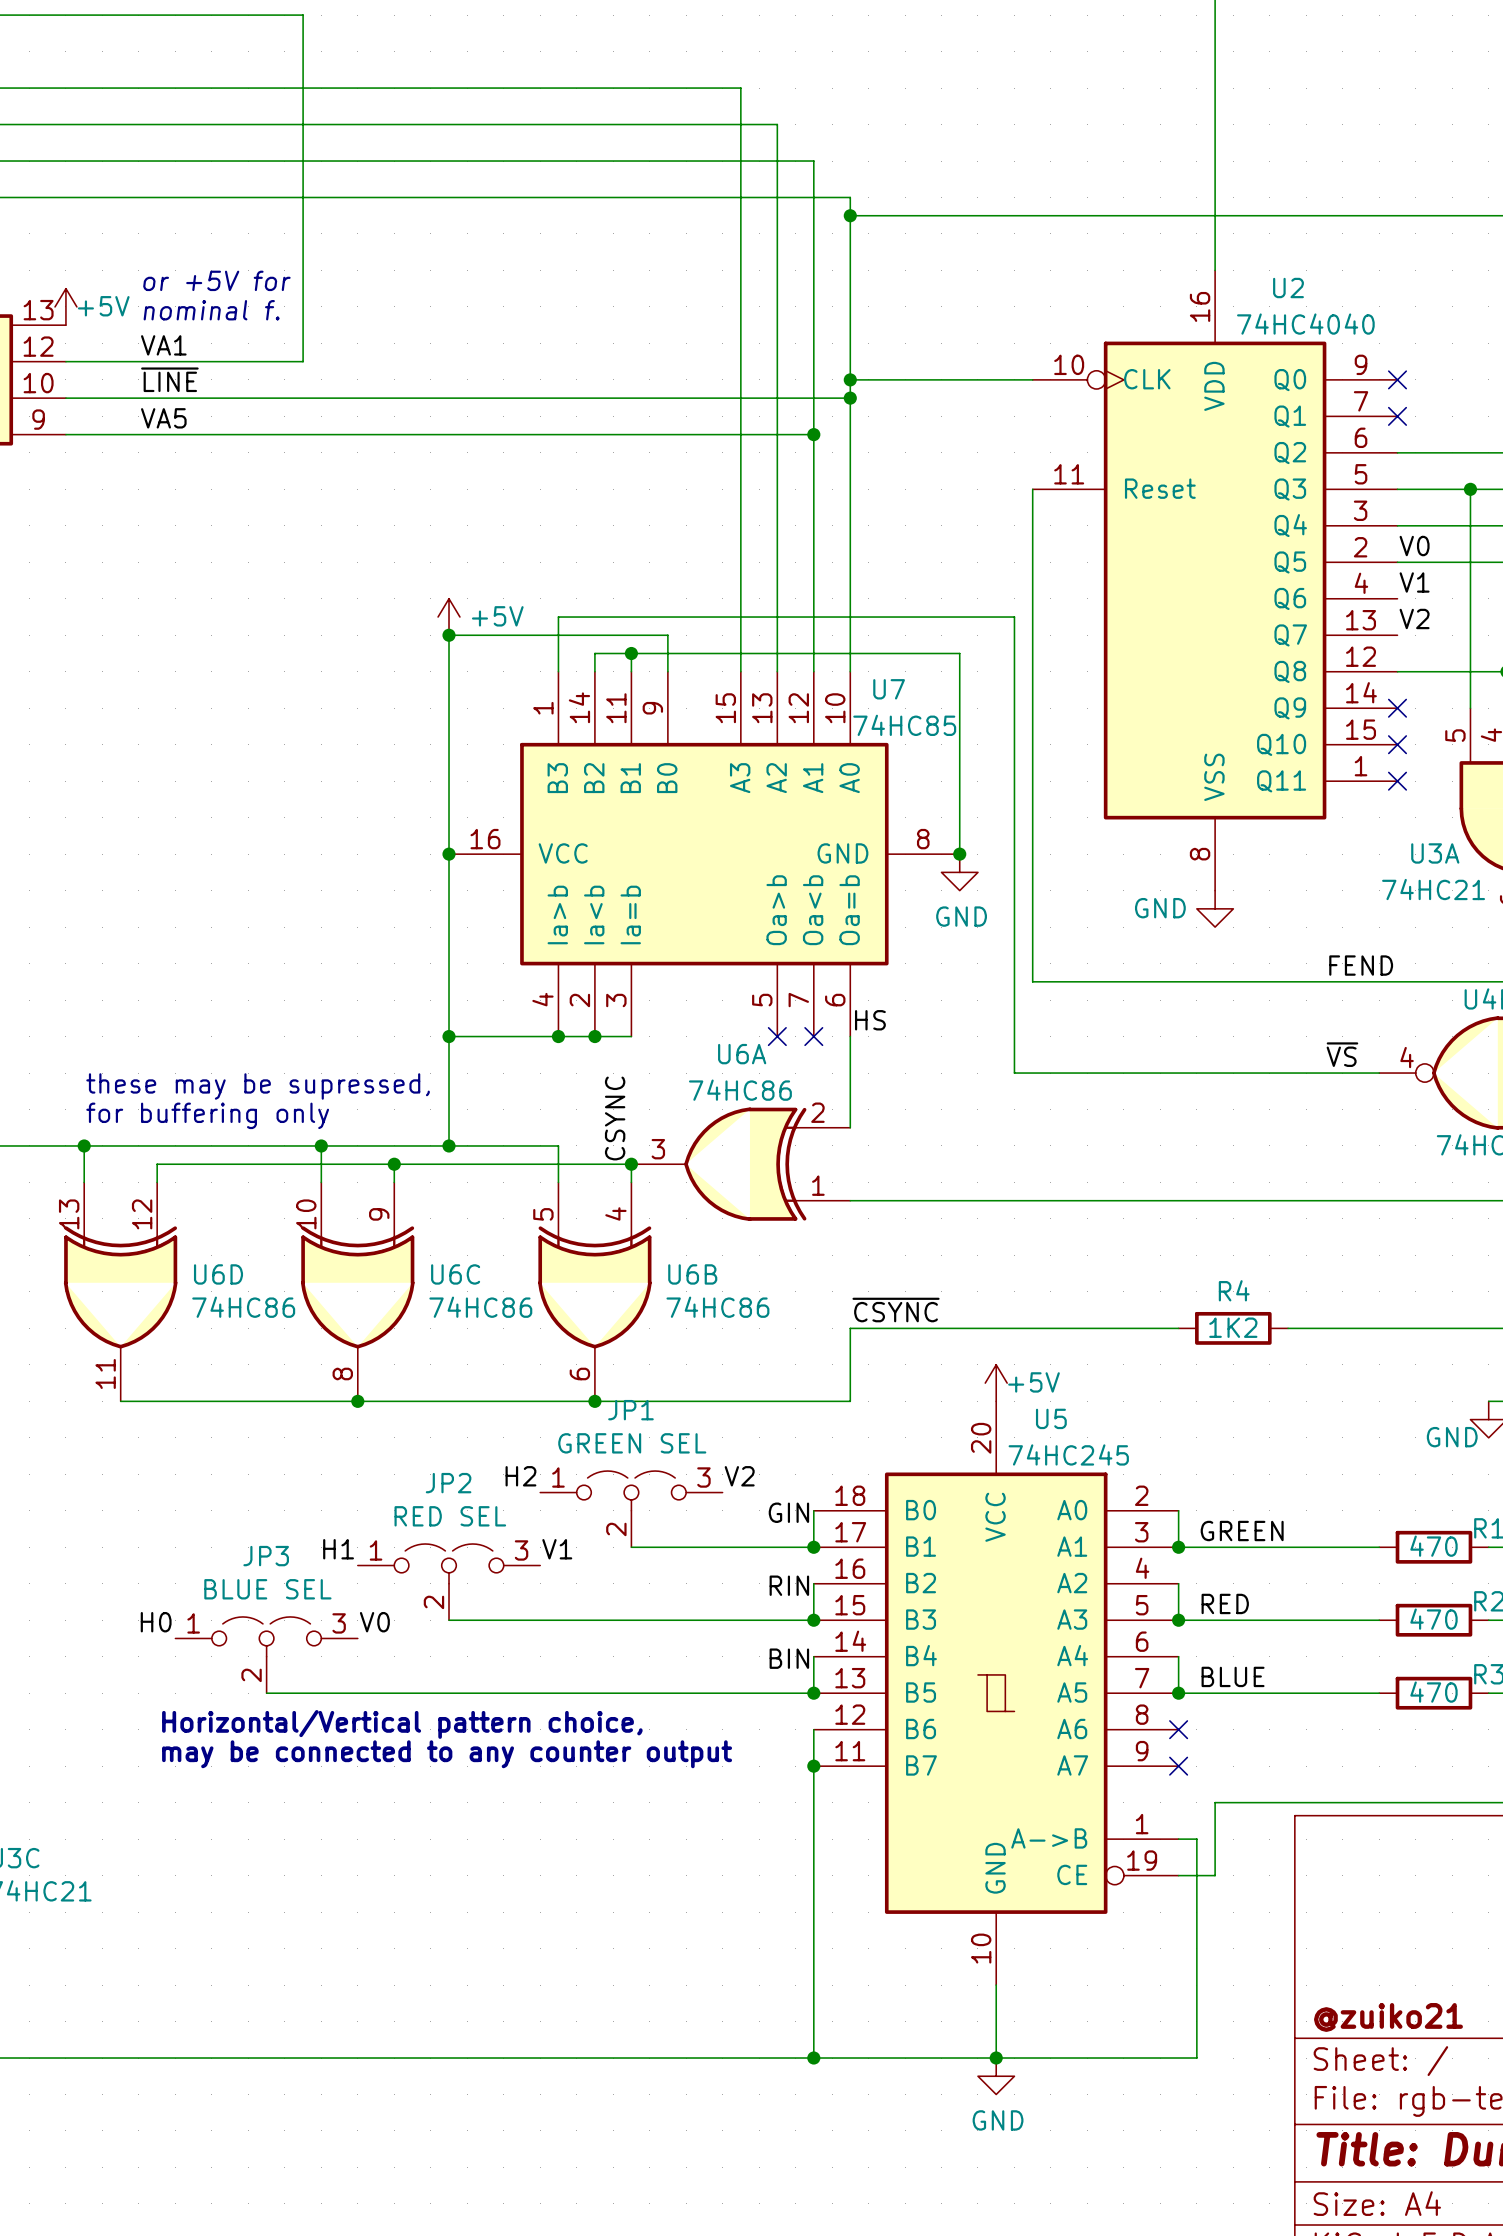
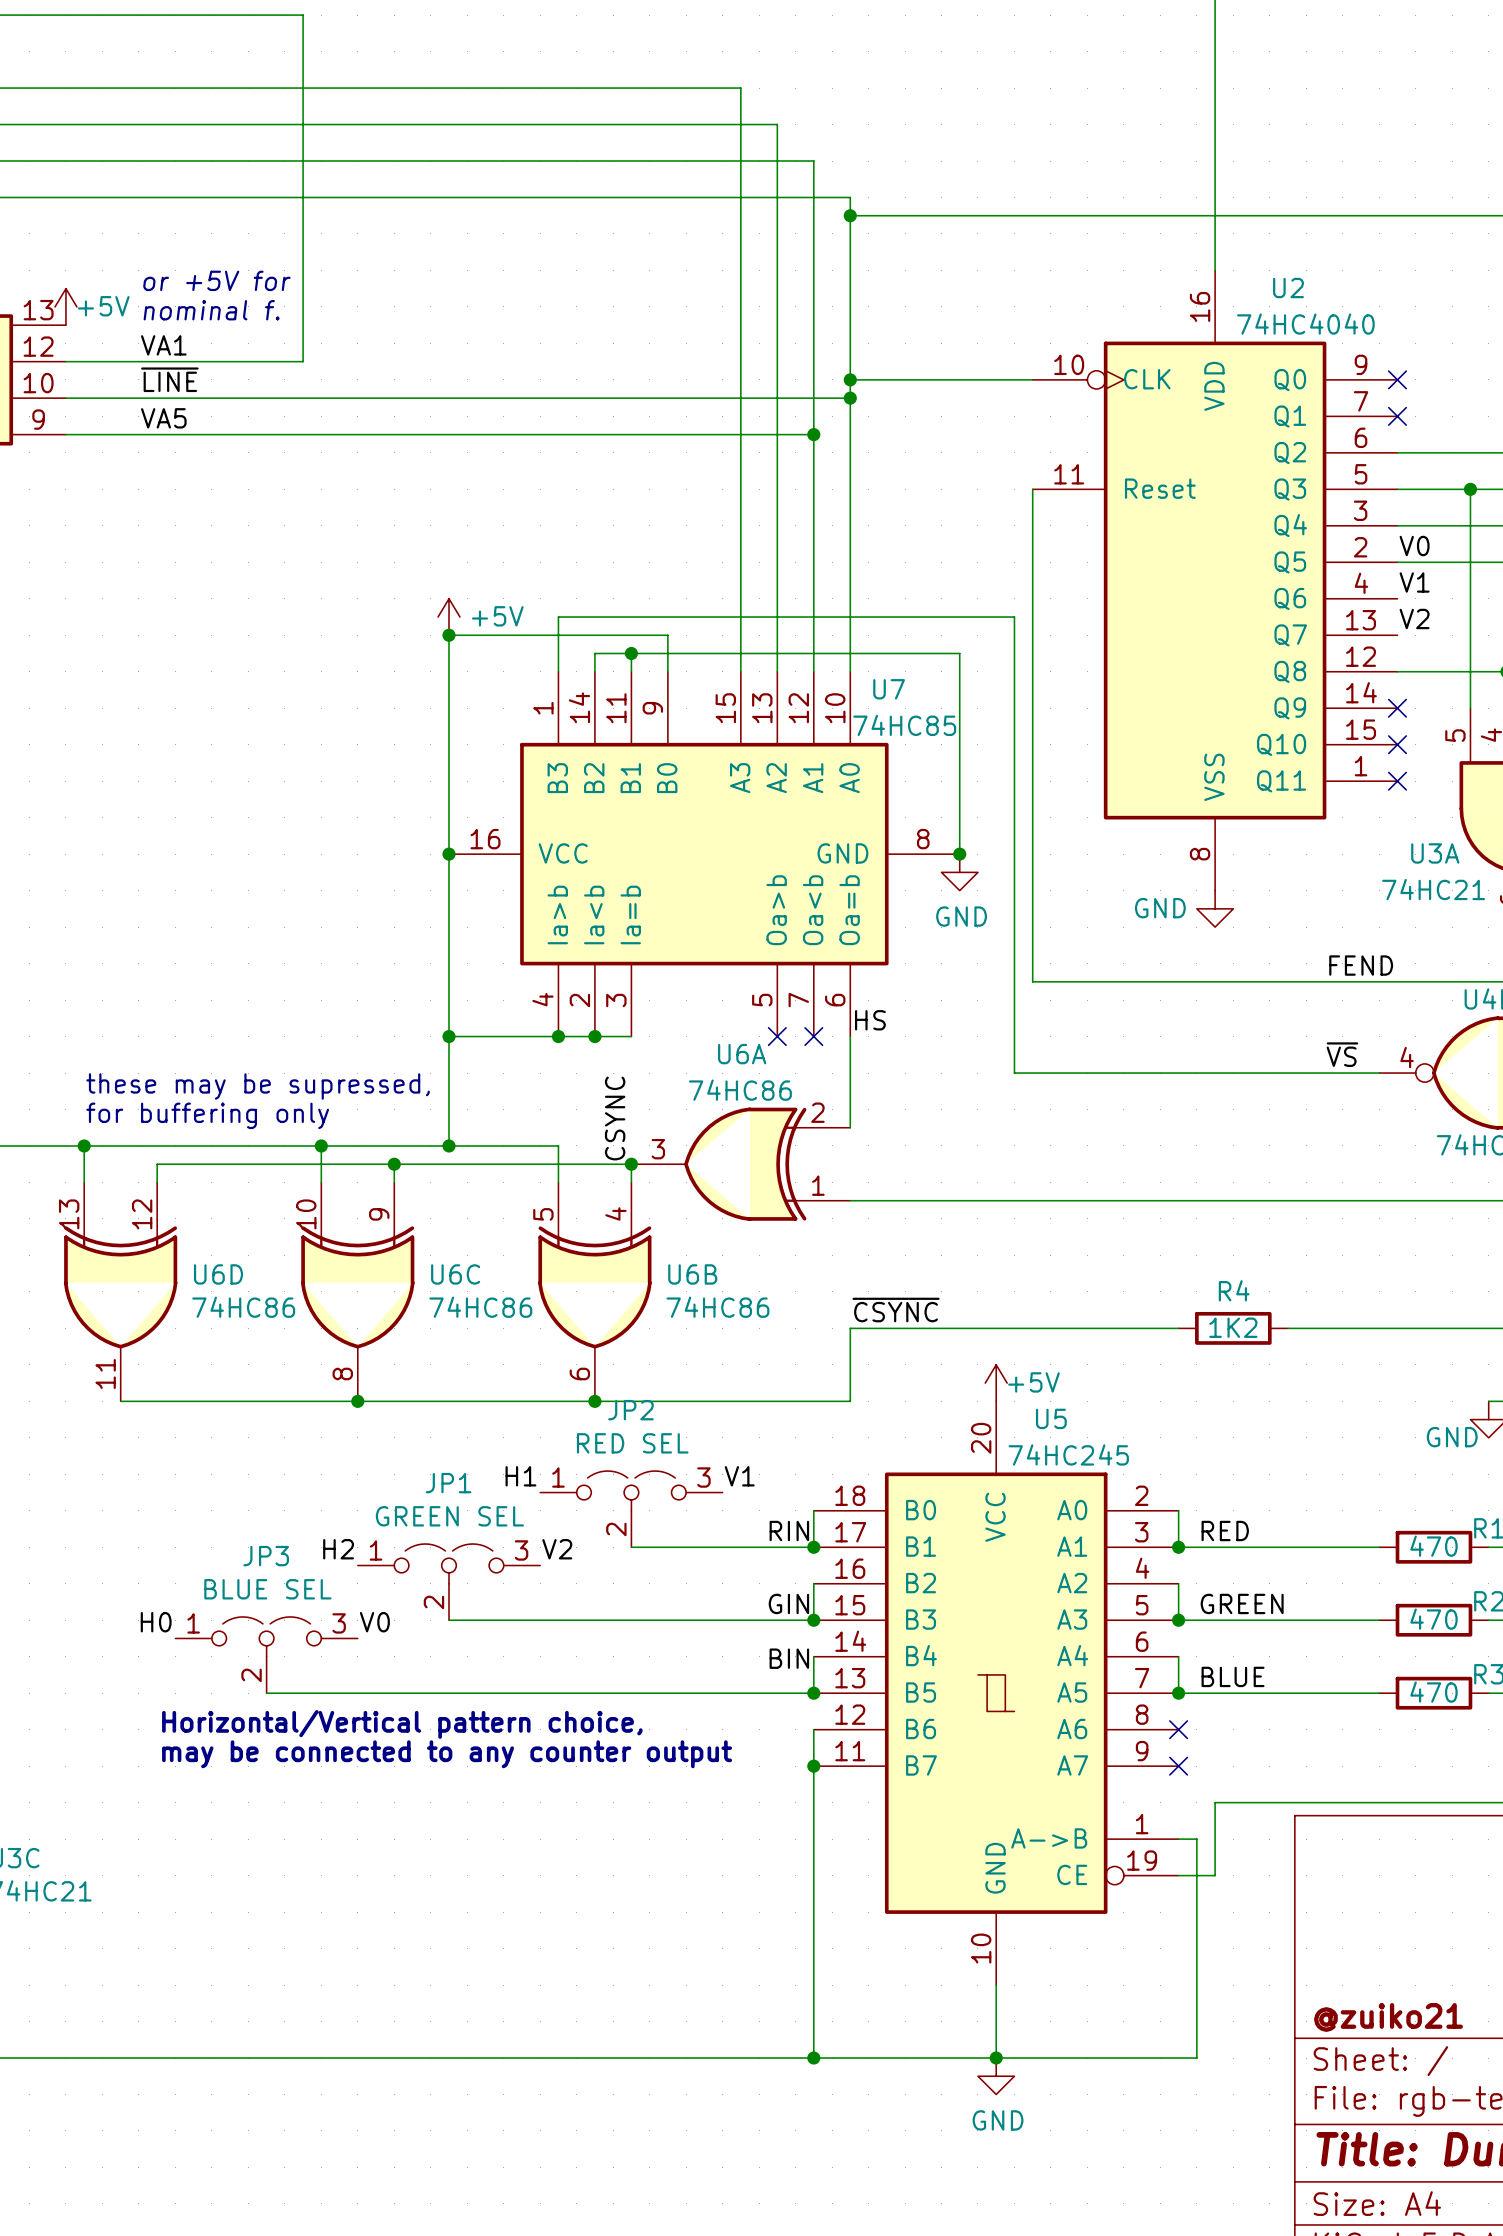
JP1 name: JP1 (630, 1410) -> JP2 (630, 1410)
JP1 value: GREEN SEL (632, 1443) -> RED SEL (632, 1443)
label: H2 (520, 1476) -> H1 (520, 1476)
label: V2 (739, 1476) -> V1 (739, 1476)
JP2 name: JP2 (448, 1483) -> JP1 (448, 1483)
label position: GIN (788, 1512) -> GIN (788, 1603)
JP2 value: RED SEL (450, 1516) -> GREEN SEL (449, 1516)
label: GREEN (1242, 1531) -> RED (1225, 1531)
label: H1 (338, 1549) -> H2 (338, 1549)
label: V1 (557, 1549) -> V2 (557, 1549)
label position: RIN (789, 1585) -> RIN (789, 1531)
label: RED (1225, 1603) -> GREEN (1242, 1603)

